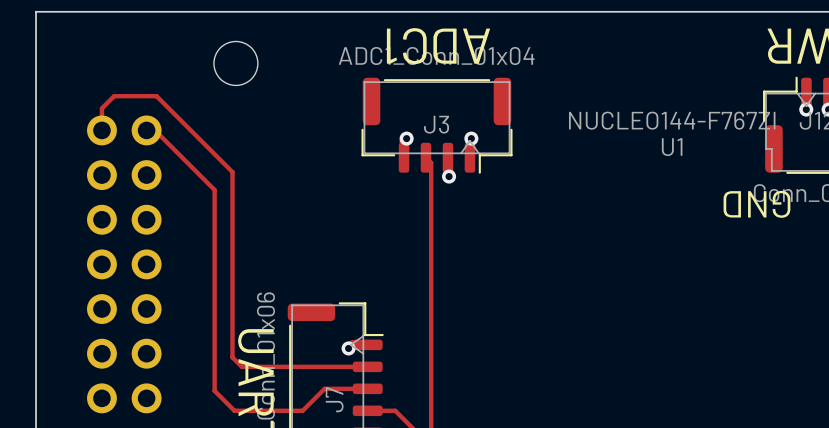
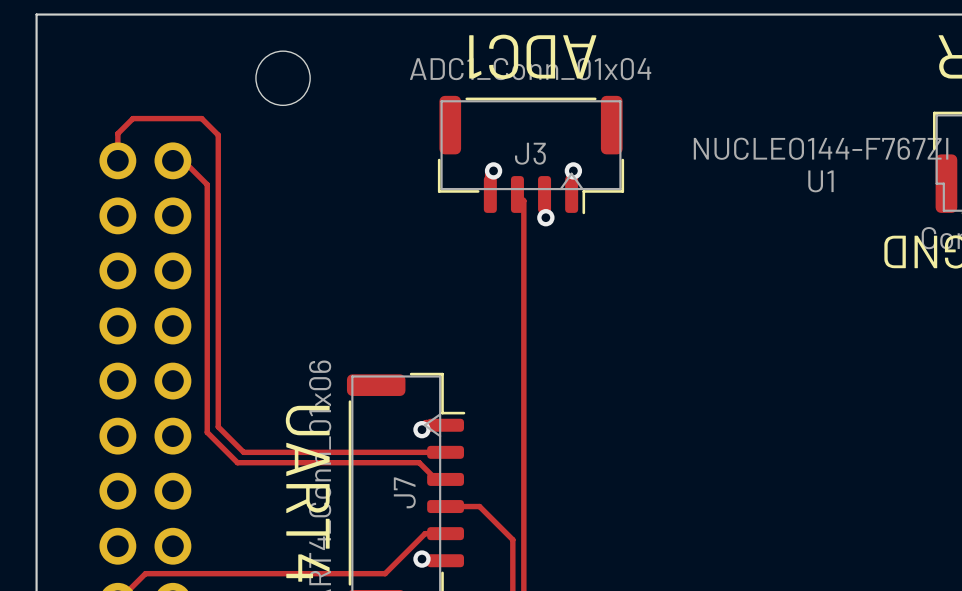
track: (156, 96) (232, 172) (232, 357) (241, 366) -> (185, 118) (201, 118) (218, 135) (218, 426) (243, 452) (290, 452)
track: (174, 149) (214, 189) (214, 390) (234, 410) (302, 410) (324, 388) (359, 388) -> (207, 184) (207, 432) (237, 462) (419, 462) (435, 479)

